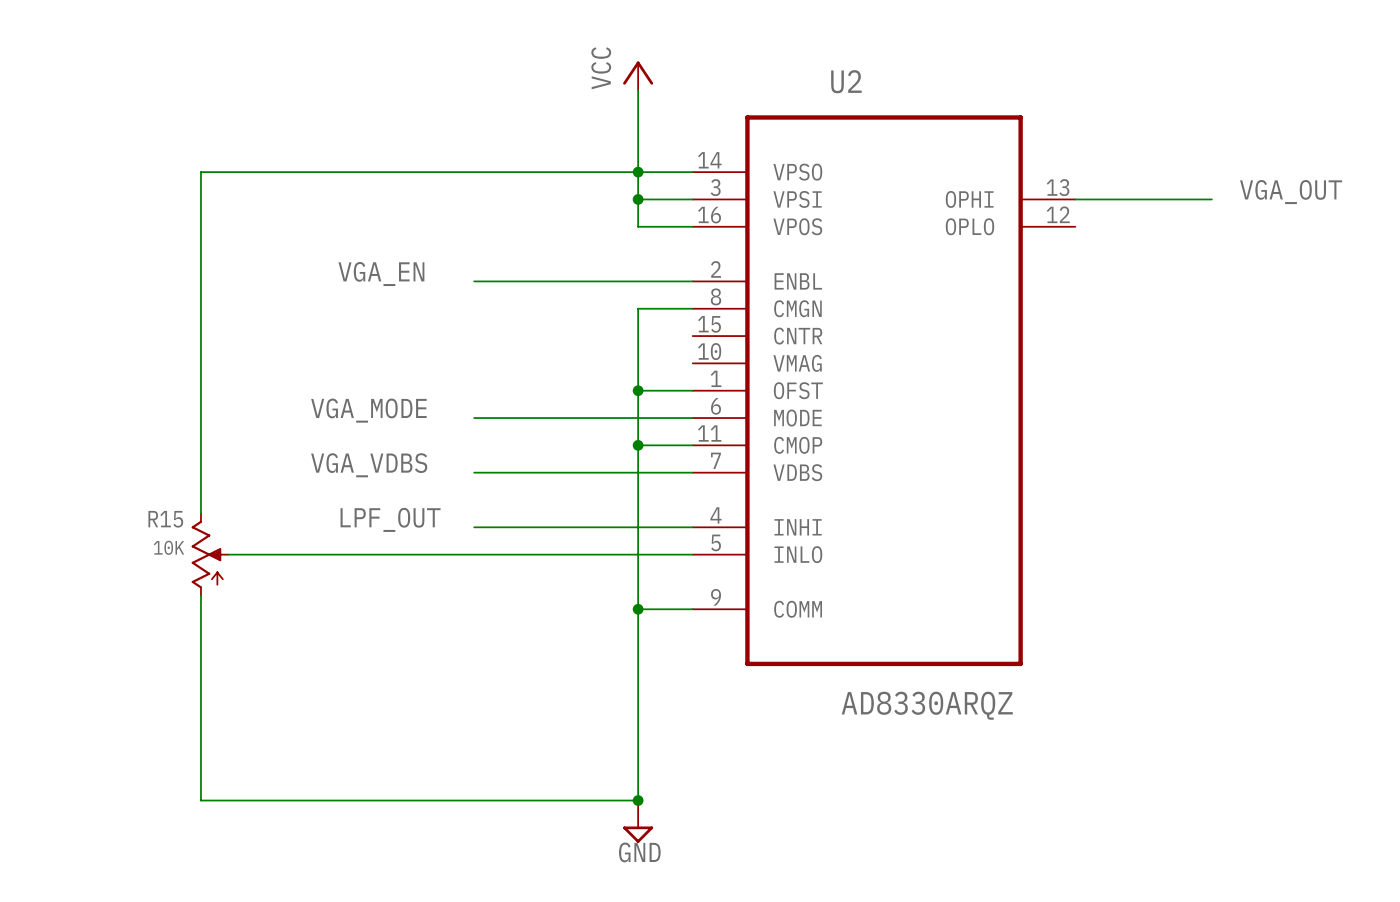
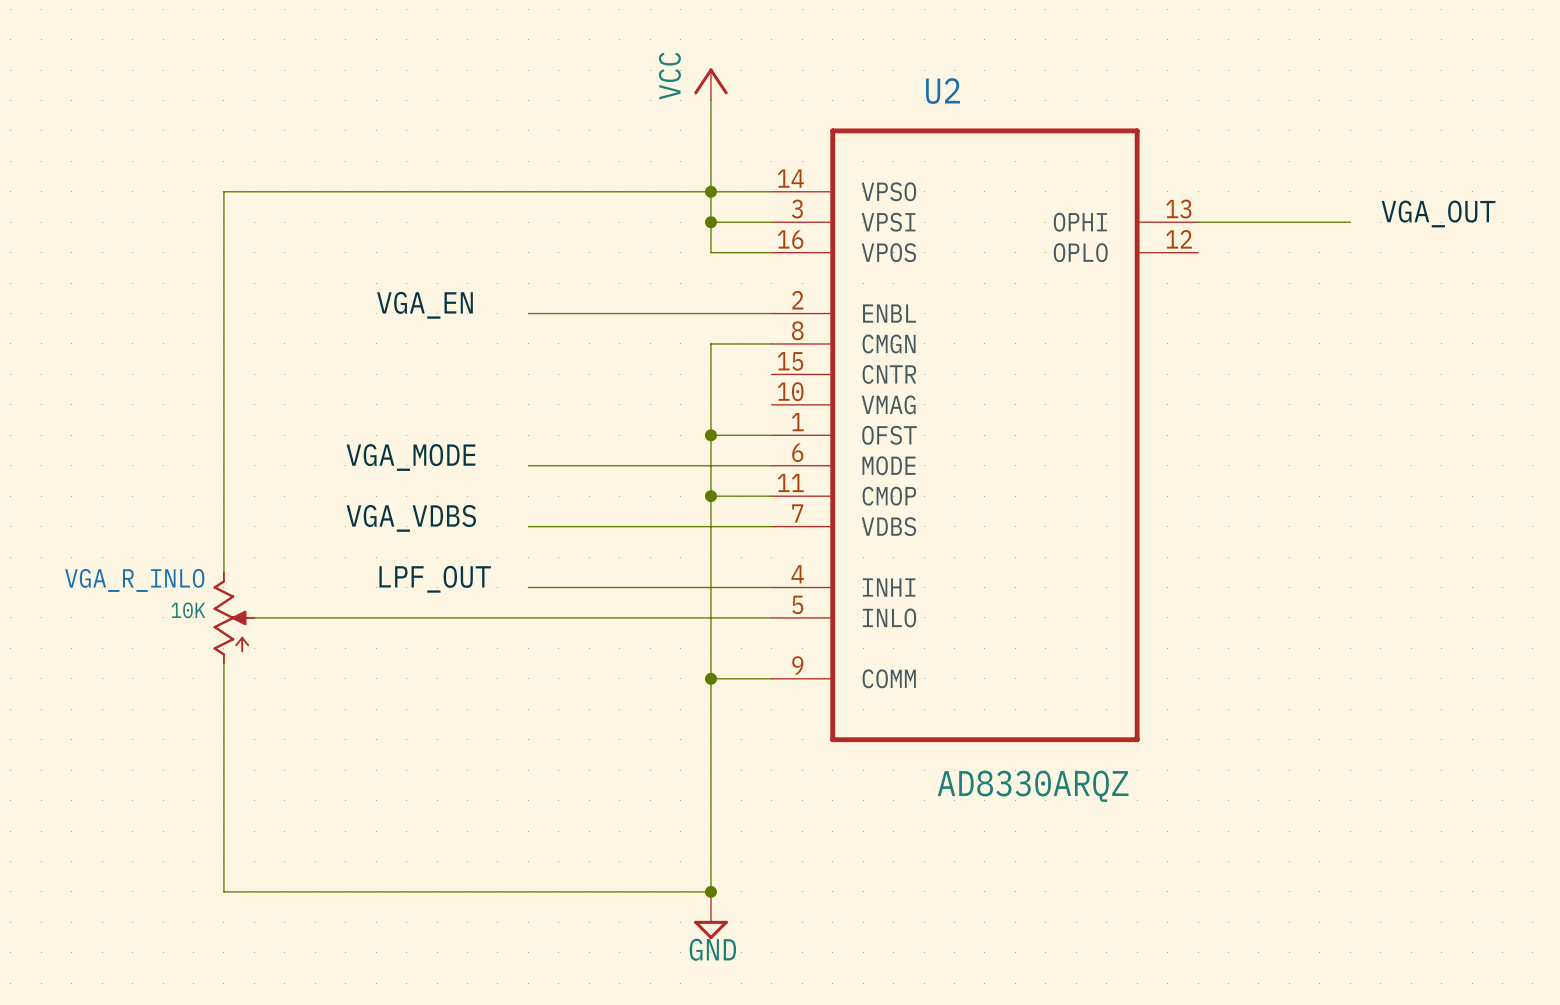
R15 name: R15 (165, 519) -> VGA_R_INLO (134, 580)

